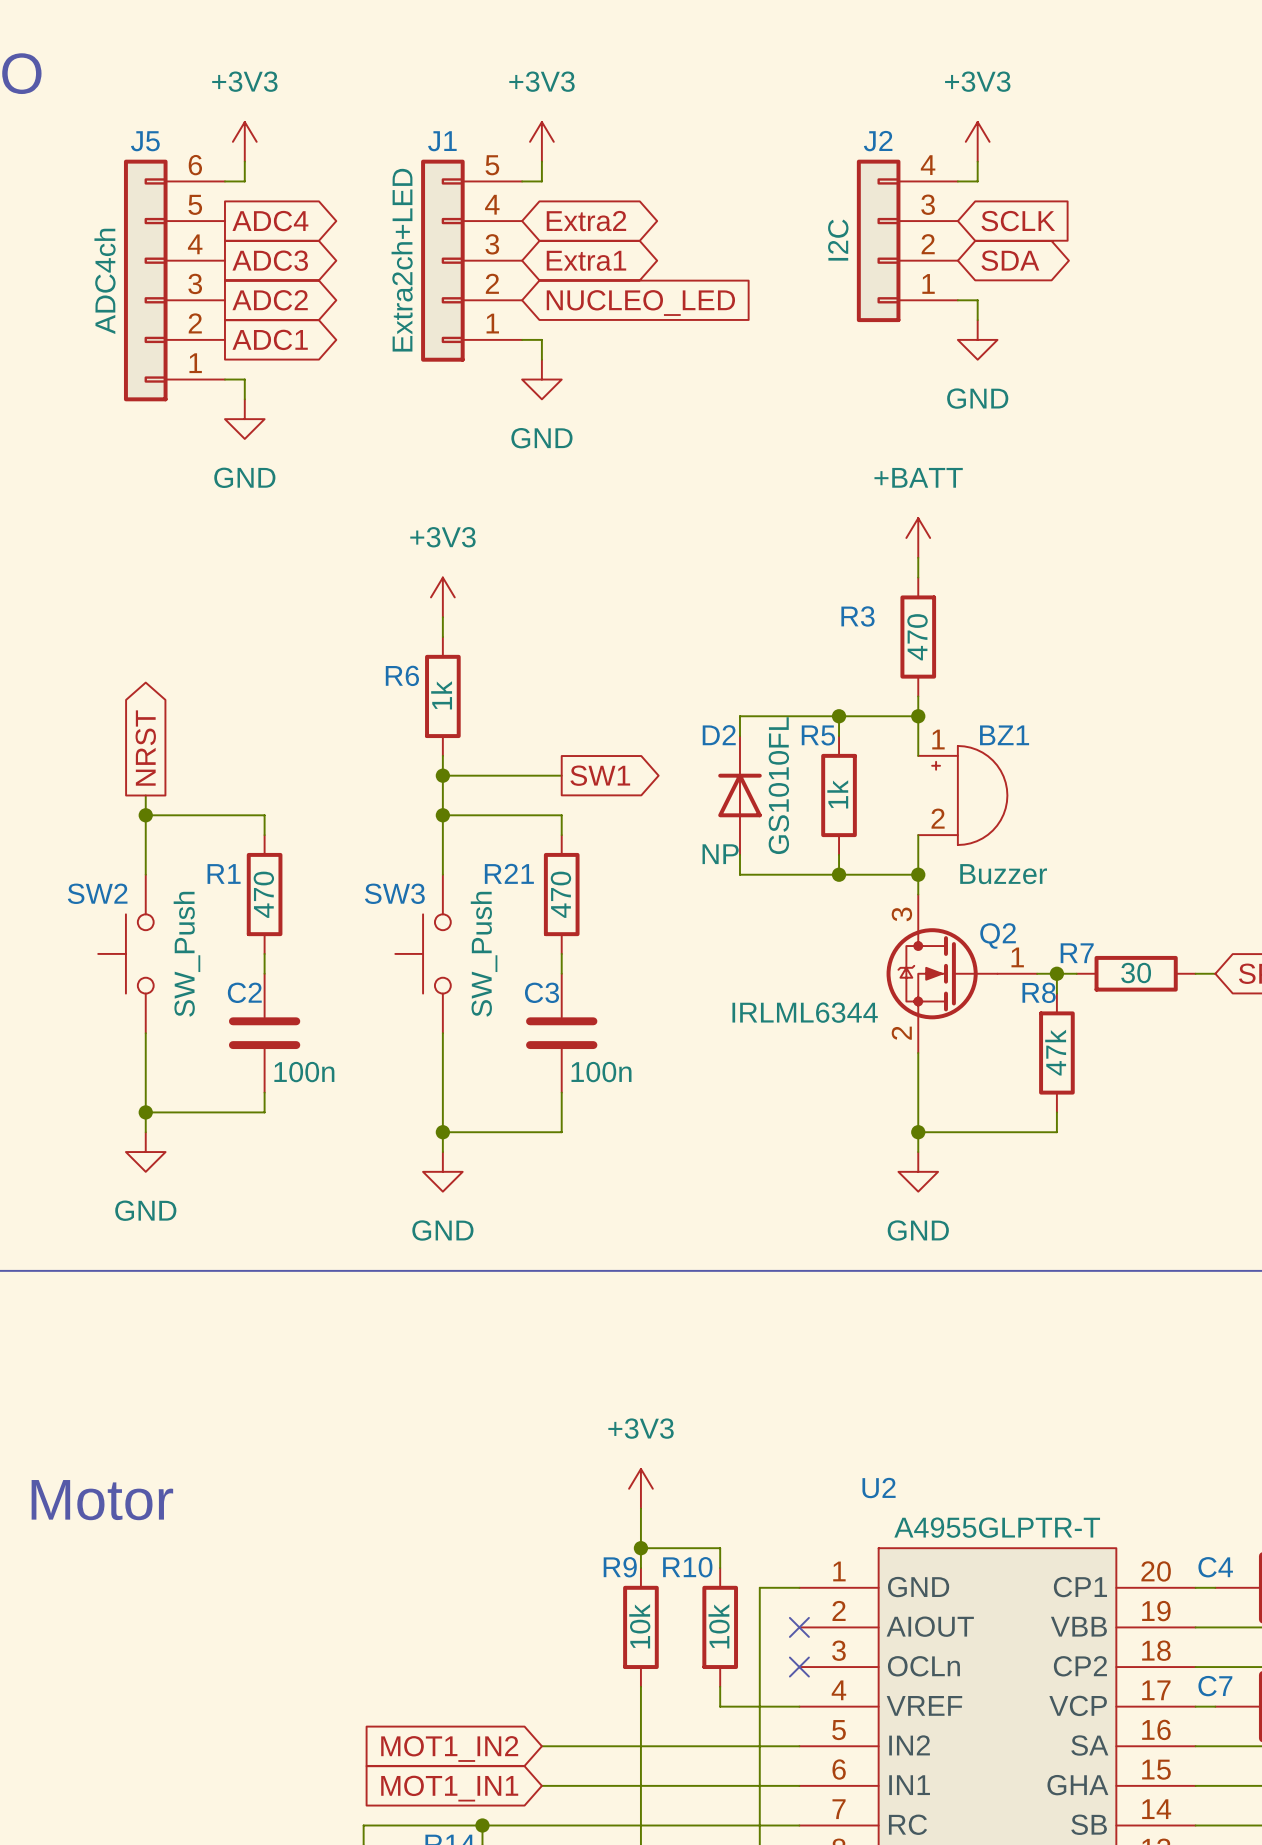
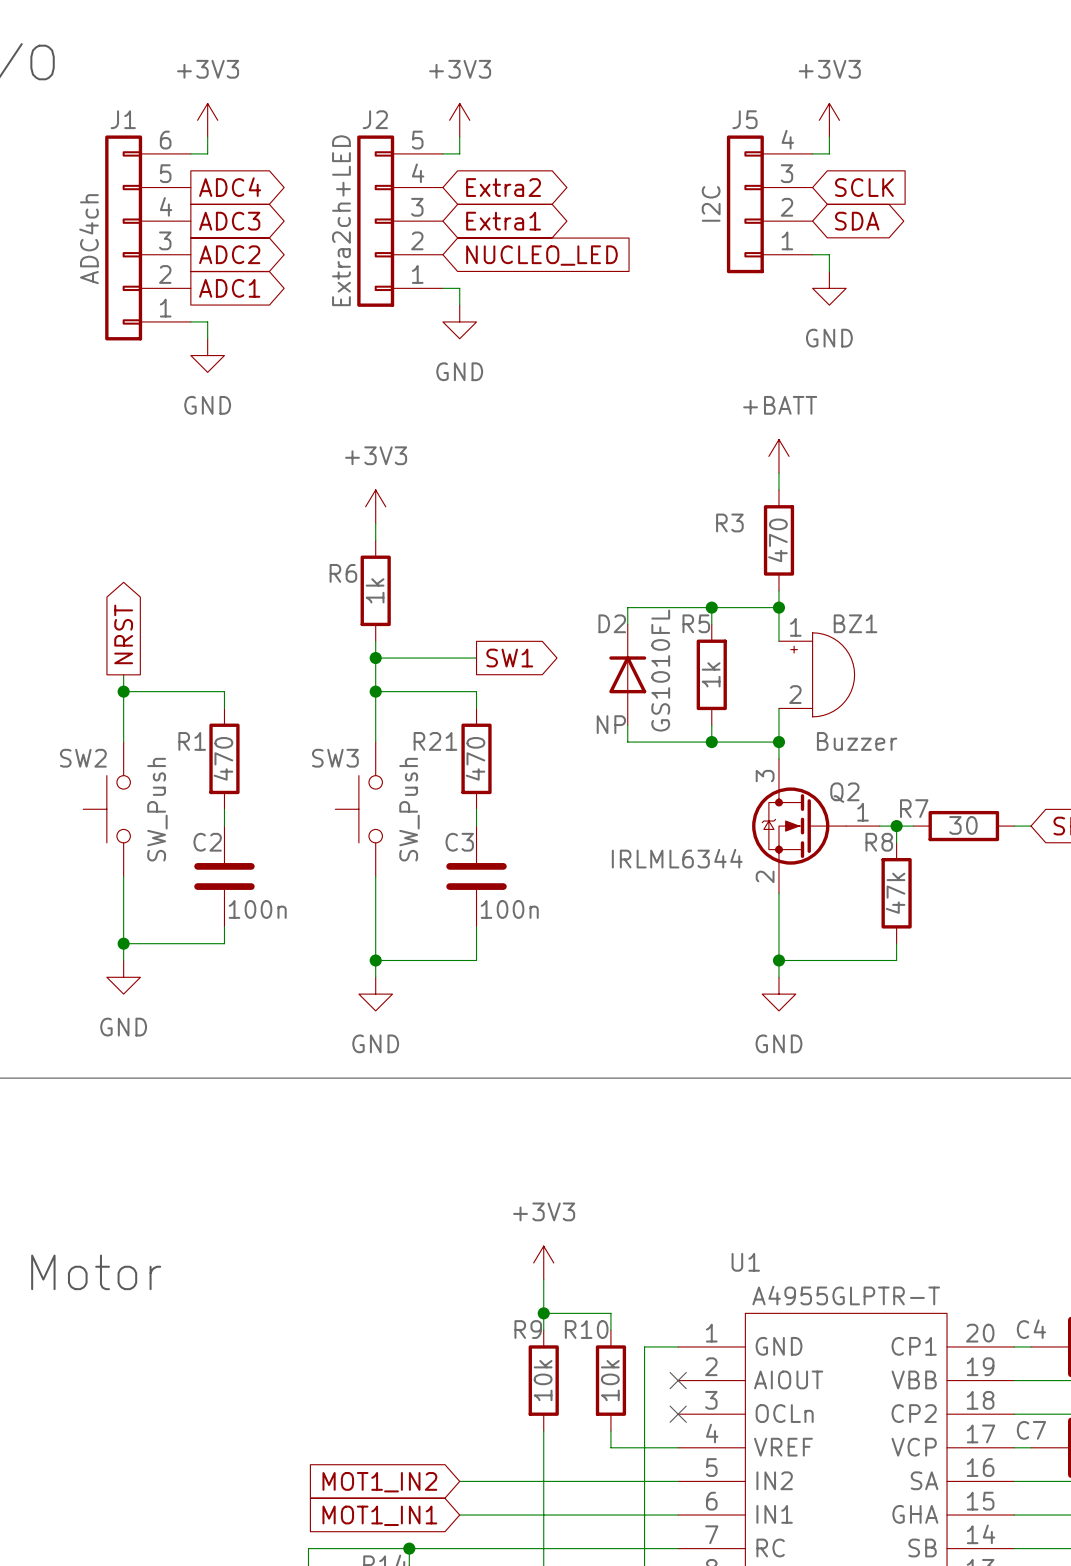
J5 name: J5 (145, 141) -> J1 (123, 119)
J1 name: J1 (442, 141) -> J2 (375, 119)
J2 name: J2 (878, 141) -> J5 (744, 119)
U2 name: U2 (879, 1488) -> U1 (745, 1262)

